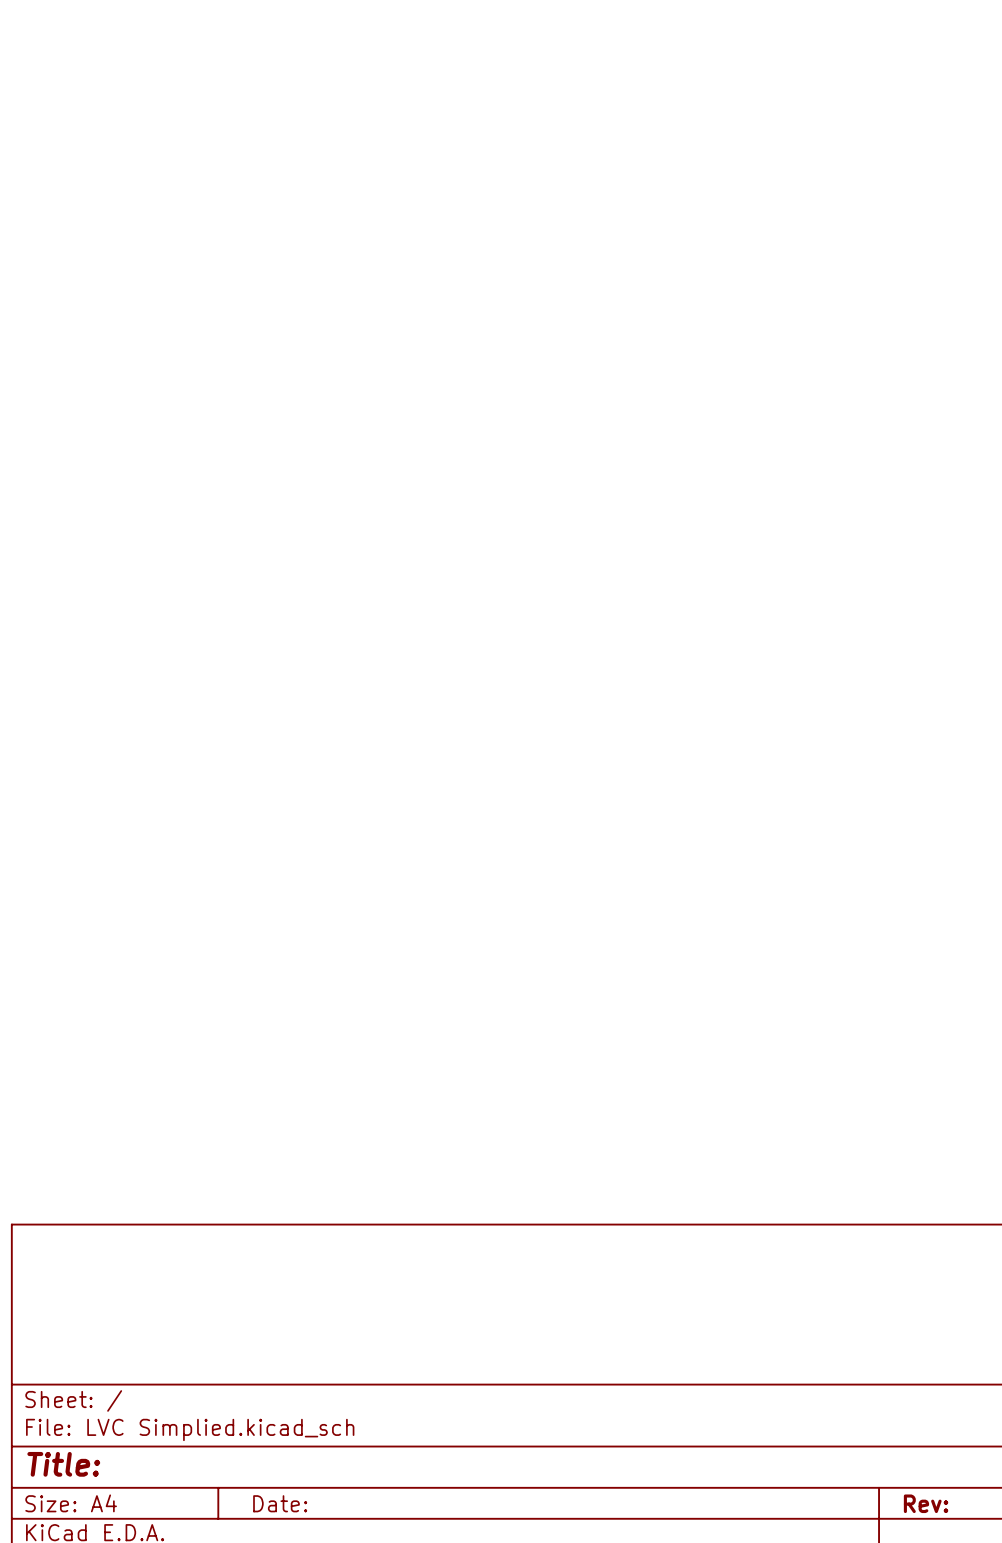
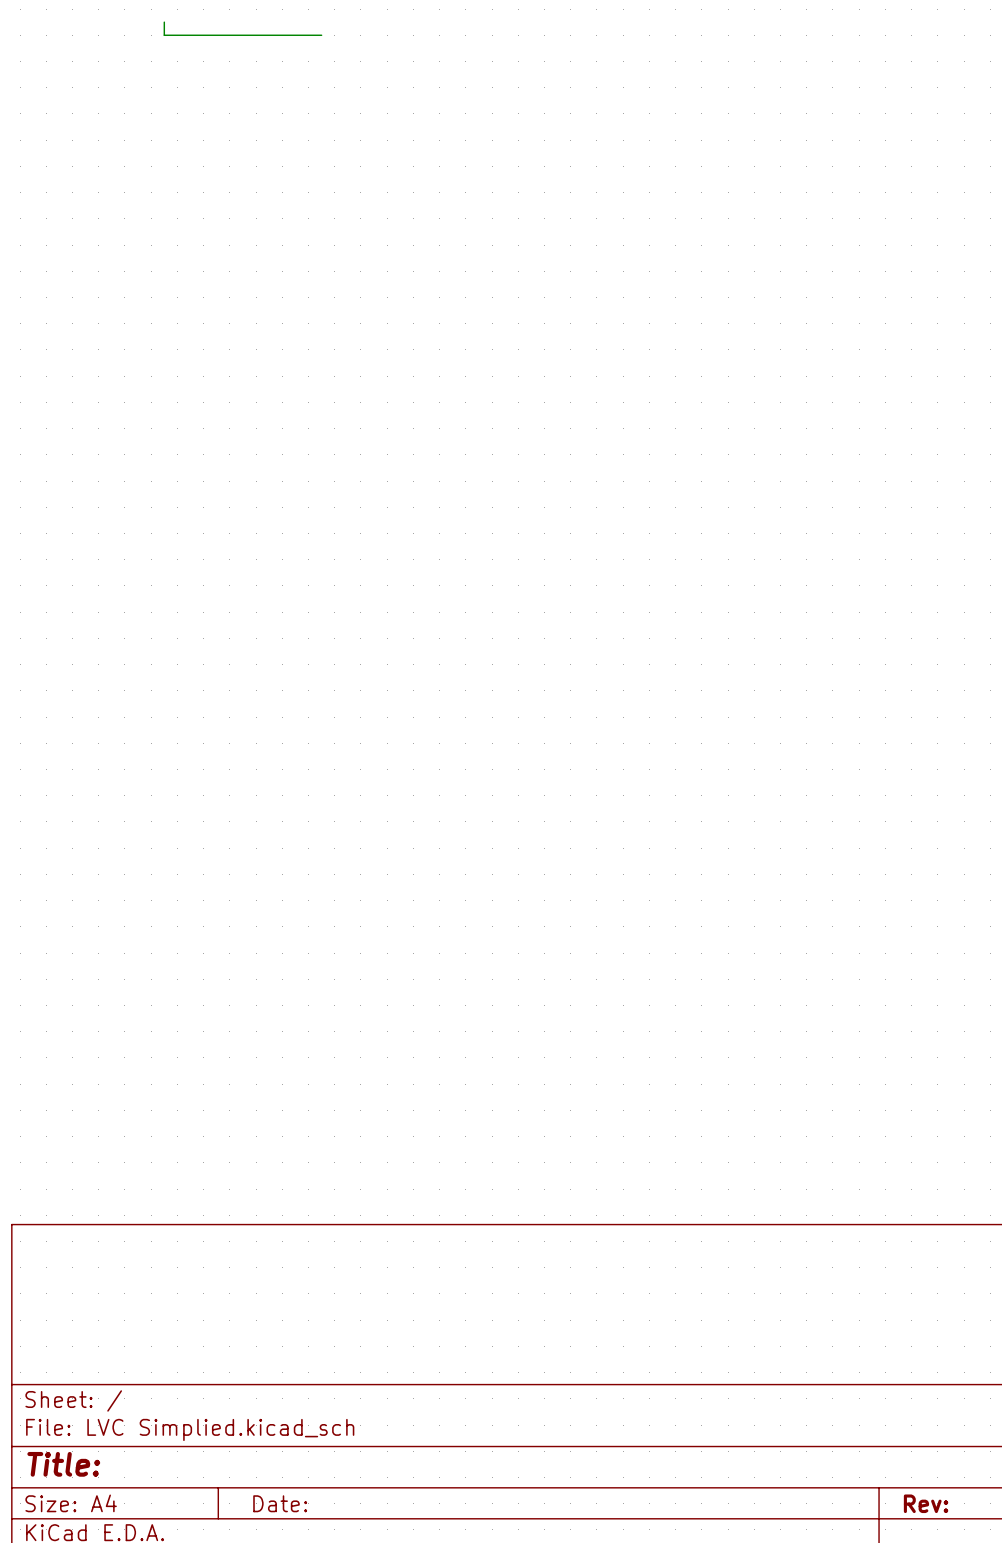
wire: none -> (164, 22) (164, 35) (321, 35)

